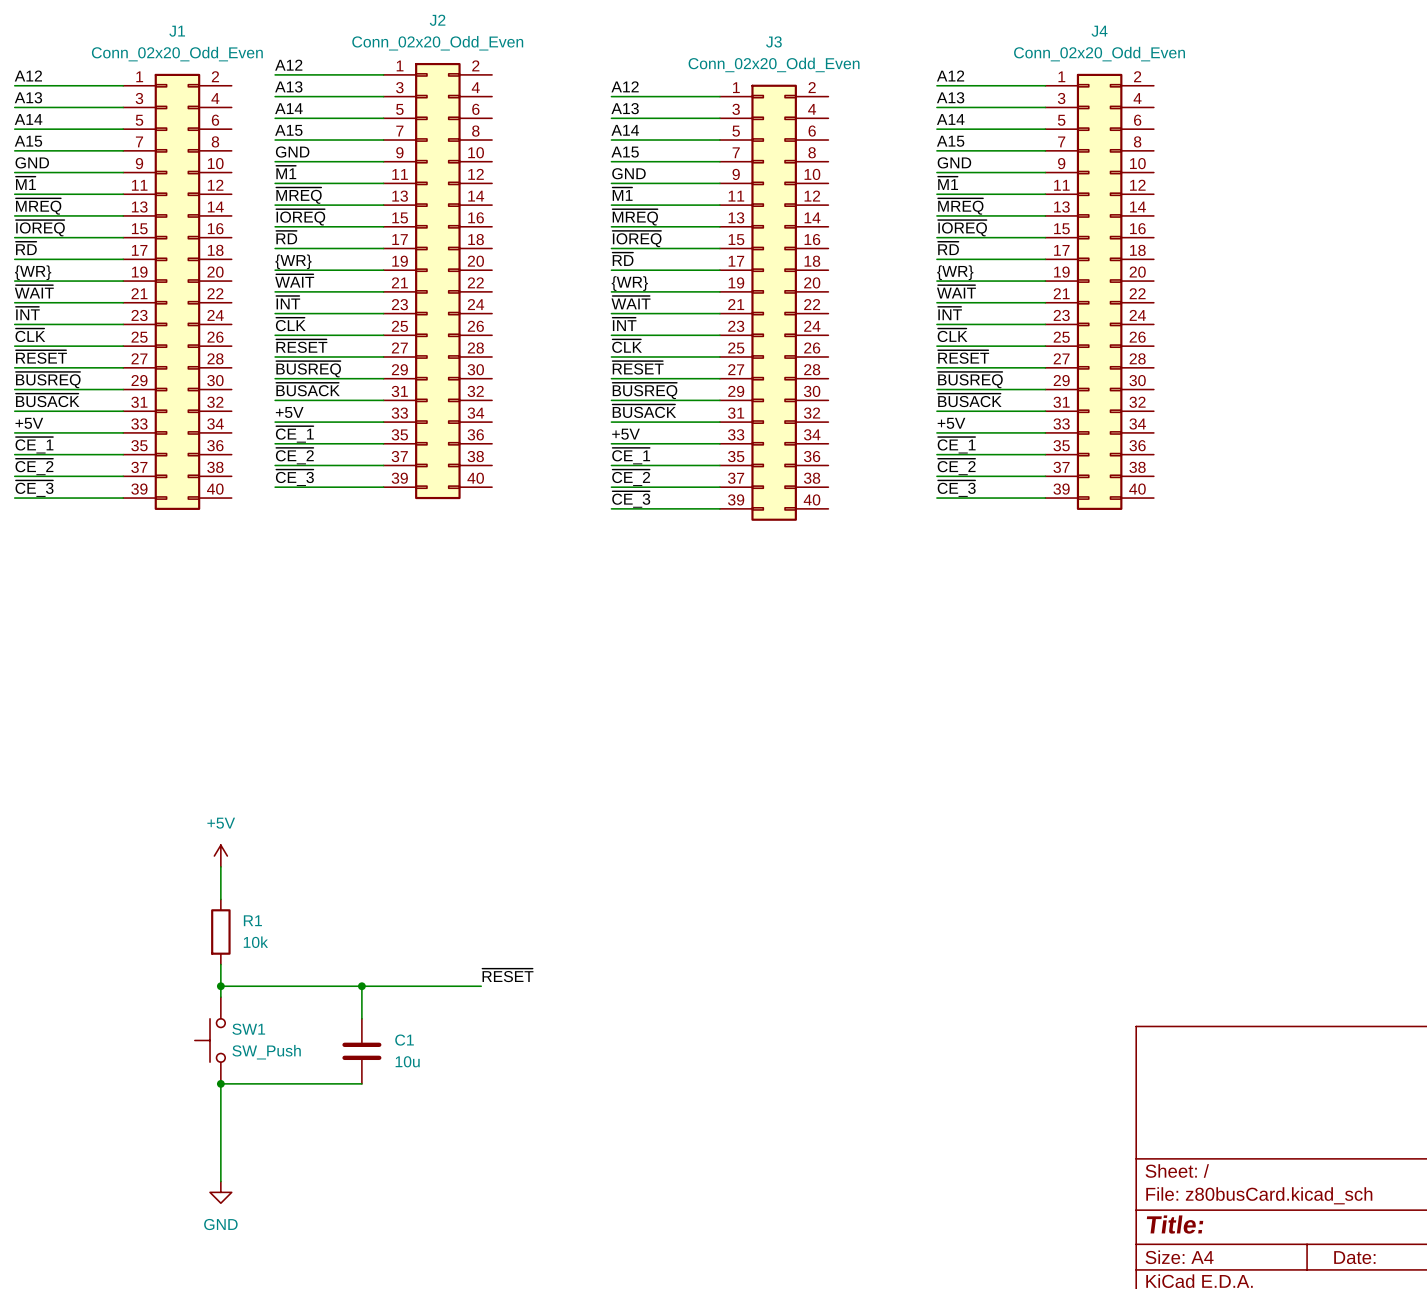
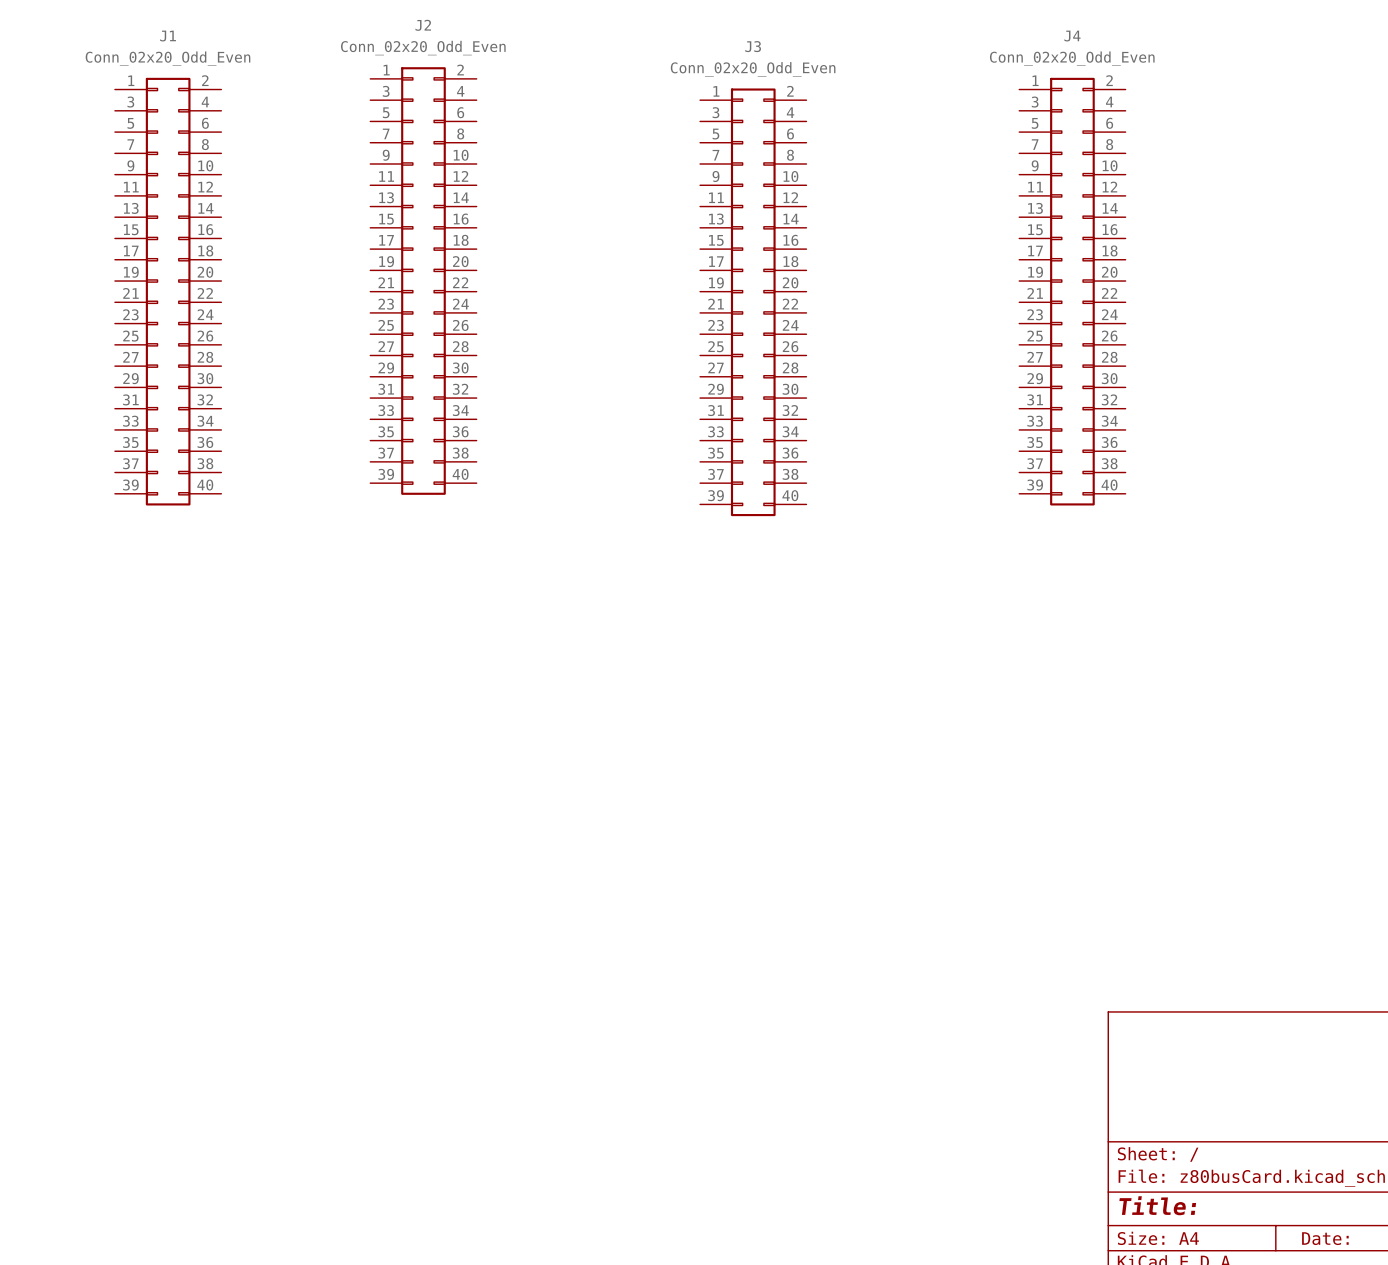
label: A12 (288, 65) -> none
wire: (275, 74) (383, 74) -> none
label: A12 (28, 76) -> none
label: A12 (950, 76) -> none
wire: (14, 85) (123, 85) -> none
wire: (936, 85) (1045, 85) -> none
label: A13 (288, 86) -> none
label: A12 (625, 86) -> none
wire: (275, 96) (383, 96) -> none
wire: (611, 96) (719, 96) -> none
label: A13 (28, 97) -> none
label: A13 (950, 97) -> none
wire: (14, 107) (123, 107) -> none
wire: (936, 107) (1045, 107) -> none
label: A14 (288, 108) -> none
label: A13 (625, 108) -> none
wire: (275, 118) (383, 118) -> none
wire: (611, 118) (719, 118) -> none
label: A14 (28, 119) -> none
label: A14 (950, 119) -> none
wire: (14, 129) (123, 129) -> none
wire: (936, 129) (1045, 129) -> none
label: A15 (288, 130) -> none
label: A14 (625, 130) -> none
wire: (275, 140) (383, 140) -> none
wire: (611, 140) (719, 140) -> none
label: A15 (28, 141) -> none
label: A15 (950, 141) -> none
wire: (14, 150) (123, 150) -> none
wire: (936, 150) (1045, 150) -> none
label: GND (292, 152) -> none
label: A15 (625, 152) -> none
wire: (275, 161) (383, 161) -> none
wire: (611, 161) (719, 161) -> none
label: GND (32, 162) -> none
label: GND (954, 162) -> none
wire: (14, 172) (123, 172) -> none
label: ~{M1} (286, 172) -> none
wire: (936, 172) (1045, 172) -> none
label: GND (628, 173) -> none
label: ~{M1} (25, 183) -> none
wire: (275, 183) (383, 183) -> none
wire: (611, 183) (719, 183) -> none
label: ~{M1} (948, 183) -> none
wire: (14, 194) (123, 194) -> none
label: ~{M1} (622, 194) -> none
wire: (936, 194) (1045, 194) -> none
label: ~{MREQ} (298, 195) -> none
wire: (275, 205) (383, 205) -> none
wire: (611, 205) (719, 205) -> none
label: ~{MREQ} (38, 206) -> none
label: ~{MREQ} (960, 206) -> none
wire: (14, 215) (123, 215) -> none
wire: (936, 215) (1045, 215) -> none
label: ~{IOREQ} (300, 217) -> none
label: ~{MREQ} (635, 217) -> none
wire: (275, 226) (383, 226) -> none
wire: (611, 226) (719, 226) -> none
label: ~{IOREQ} (40, 228) -> none
label: ~{IOREQ} (962, 228) -> none
wire: (14, 237) (123, 237) -> none
label: ~{RD} (286, 237) -> none
wire: (936, 237) (1045, 237) -> none
label: ~{IOREQ} (637, 239) -> none
label: ~{RD} (26, 248) -> none
wire: (275, 248) (383, 248) -> none
wire: (611, 248) (719, 248) -> none
label: ~{RD} (948, 248) -> none
wire: (14, 259) (123, 259) -> none
label: ~{RD} (622, 259) -> none
wire: (936, 259) (1045, 259) -> none
label: {WR} (293, 261) -> none
wire: (275, 270) (383, 270) -> none
wire: (611, 270) (719, 270) -> none
label: {WR} (33, 272) -> none
label: {WR} (955, 272) -> none
label: ~{WAIT} (294, 280) -> none
wire: (14, 281) (123, 281) -> none
wire: (936, 281) (1045, 281) -> none
label: {WR} (629, 283) -> none
label: ~{WAIT} (34, 291) -> none
wire: (275, 291) (383, 291) -> none
wire: (611, 291) (719, 291) -> none
label: ~{WAIT} (956, 291) -> none
wire: (14, 302) (123, 302) -> none
label: ~{INT} (288, 302) -> none
label: ~{WAIT} (630, 302) -> none
wire: (936, 302) (1045, 302) -> none
label: ~{INT} (27, 313) -> none
wire: (275, 313) (383, 313) -> none
wire: (611, 313) (719, 313) -> none
label: ~{INT} (949, 313) -> none
wire: (14, 324) (123, 324) -> none
label: ~{CLK} (290, 324) -> none
label: ~{INT} (624, 324) -> none
wire: (936, 324) (1045, 324) -> none
label: ~{CLK} (30, 335) -> none
wire: (275, 335) (383, 335) -> none
wire: (611, 335) (719, 335) -> none
label: ~{CLK} (952, 335) -> none
wire: (14, 346) (123, 346) -> none
label: ~{RESET} (301, 346) -> none
label: ~{CLK} (627, 346) -> none
wire: (936, 346) (1045, 346) -> none
label: ~{RESET} (41, 356) -> none
wire: (275, 356) (383, 356) -> none
wire: (611, 356) (719, 356) -> none
label: ~{RESET} (963, 356) -> none
wire: (14, 367) (123, 367) -> none
label: ~{RESET} (638, 367) -> none
wire: (936, 367) (1045, 367) -> none
label: ~{BUSREQ} (308, 369) -> none
wire: (275, 378) (383, 378) -> none
wire: (611, 378) (719, 378) -> none
label: ~{BUSREQ} (48, 380) -> none
label: ~{BUSREQ} (970, 380) -> none
wire: (14, 389) (123, 389) -> none
label: ~{BUSACK} (307, 389) -> none
wire: (936, 389) (1045, 389) -> none
label: ~{BUSREQ} (644, 390) -> none
label: ~{BUSACK} (47, 400) -> none
wire: (275, 400) (383, 400) -> none
wire: (611, 400) (719, 400) -> none
label: ~{BUSACK} (969, 400) -> none
wire: (14, 411) (123, 411) -> none
label: ~{BUSACK} (644, 411) -> none
wire: (936, 411) (1045, 411) -> none
label: +5V (289, 412) -> none
wire: (275, 422) (383, 422) -> none
wire: (611, 422) (719, 422) -> none
label: +5V (29, 423) -> none
label: +5V (951, 423) -> none
wire: (14, 432) (123, 432) -> none
wire: (936, 432) (1045, 432) -> none
label: ~{CE_1} (294, 434) -> none
label: +5V (626, 434) -> none
wire: (275, 443) (383, 443) -> none
wire: (611, 443) (719, 443) -> none
label: ~{CE_1} (34, 445) -> none
label: ~{CE_1} (956, 445) -> none
wire: (14, 454) (123, 454) -> none
wire: (936, 454) (1045, 454) -> none
label: ~{CE_2} (294, 456) -> none
label: ~{CE_1} (631, 456) -> none
wire: (275, 465) (383, 465) -> none
wire: (611, 465) (719, 465) -> none
label: ~{CE_2} (34, 466) -> none
label: ~{CE_2} (956, 466) -> none
wire: (14, 476) (123, 476) -> none
wire: (936, 476) (1045, 476) -> none
label: ~{CE_3} (294, 477) -> none
label: ~{CE_2} (631, 477) -> none
wire: (275, 487) (383, 487) -> none
wire: (611, 487) (719, 487) -> none
label: ~{CE_3} (34, 488) -> none
label: ~{CE_3} (956, 488) -> none
wire: (14, 498) (123, 498) -> none
wire: (936, 498) (1045, 498) -> none
label: ~{CE_3} (631, 499) -> none
wire: (611, 508) (719, 508) -> none
power symbol: +5V (220, 856) -> none
wire: (220, 866) (220, 899) -> none
R1: 10k (220, 931) -> none
wire: (220, 964) (220, 997) -> none
label: ~{RESET} (507, 975) -> none
wire: (220, 986) (481, 986) -> none
junction: (220, 986) -> none
wire: (361, 986) (361, 1018) -> none
junction: (361, 986) -> none
SW1: SW_Push (210, 1040) -> none
C1: 10u (361, 1051) -> none
junction: (220, 1083) -> none
wire: (361, 1083) (220, 1083) (220, 1181) -> none
power symbol: GND (220, 1192) -> none

